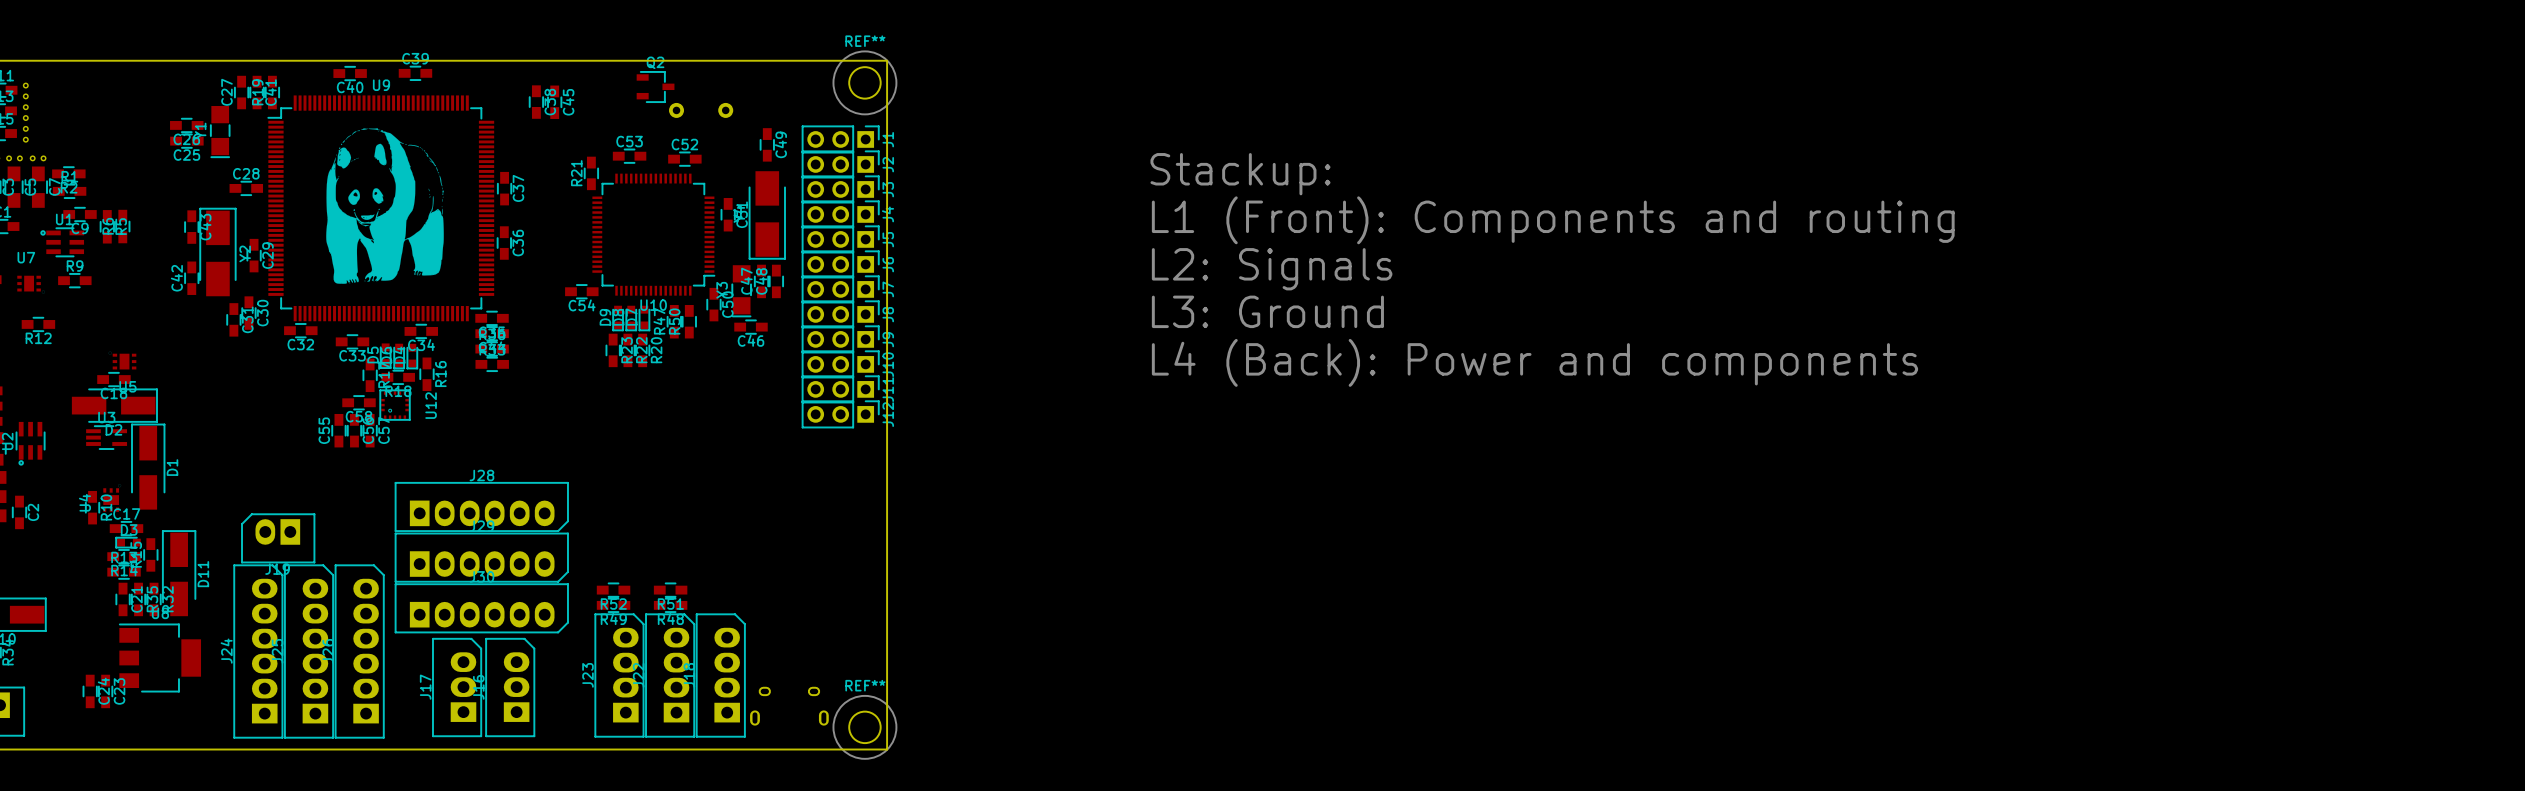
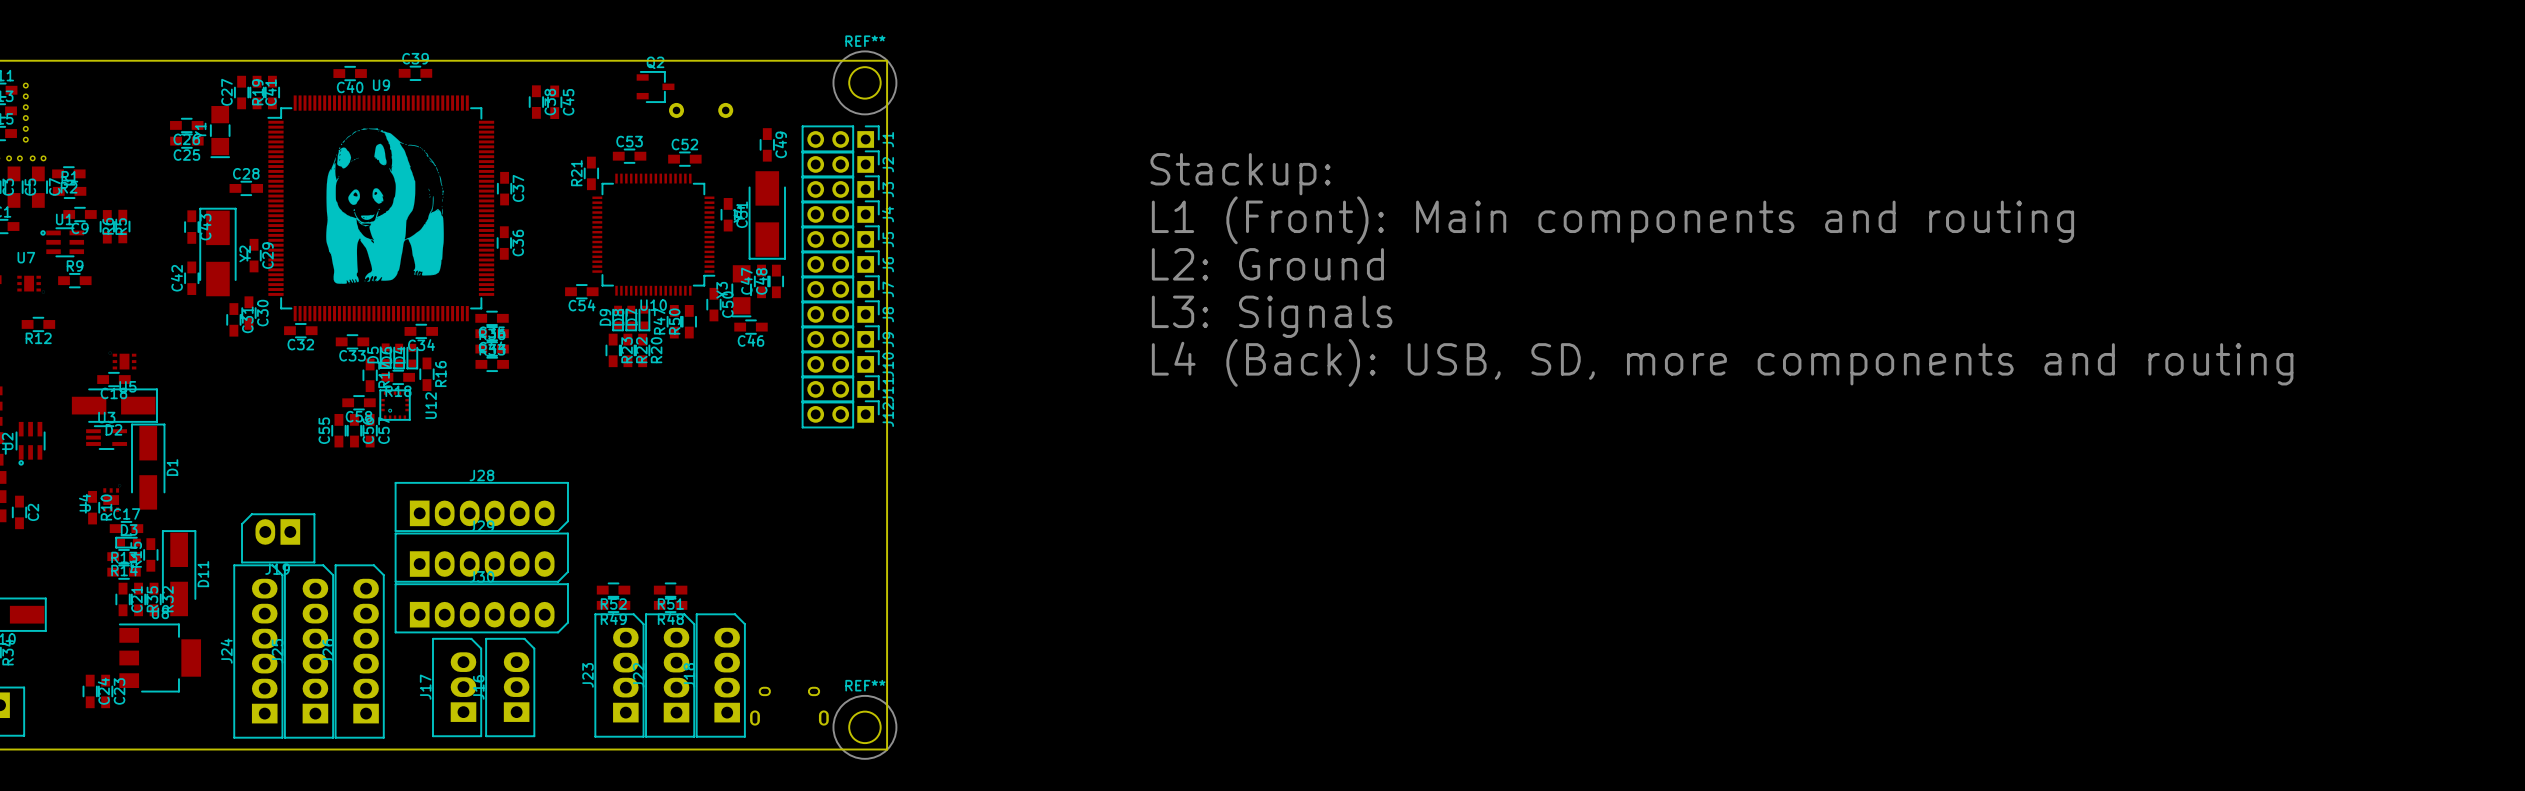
text: L1 (Front): Components and routing (1553, 220) -> L1 (Front): Main components and routing (1612, 220)
text: L2: Signals (1272, 269) -> L2: Ground (1267, 264)
text: L3: Ground (1267, 311) -> L3: Signals (1272, 316)
text: L4 (Back): Power and components (1534, 362) -> L4 (Back): USB, SD, more components and routing (1722, 362)

